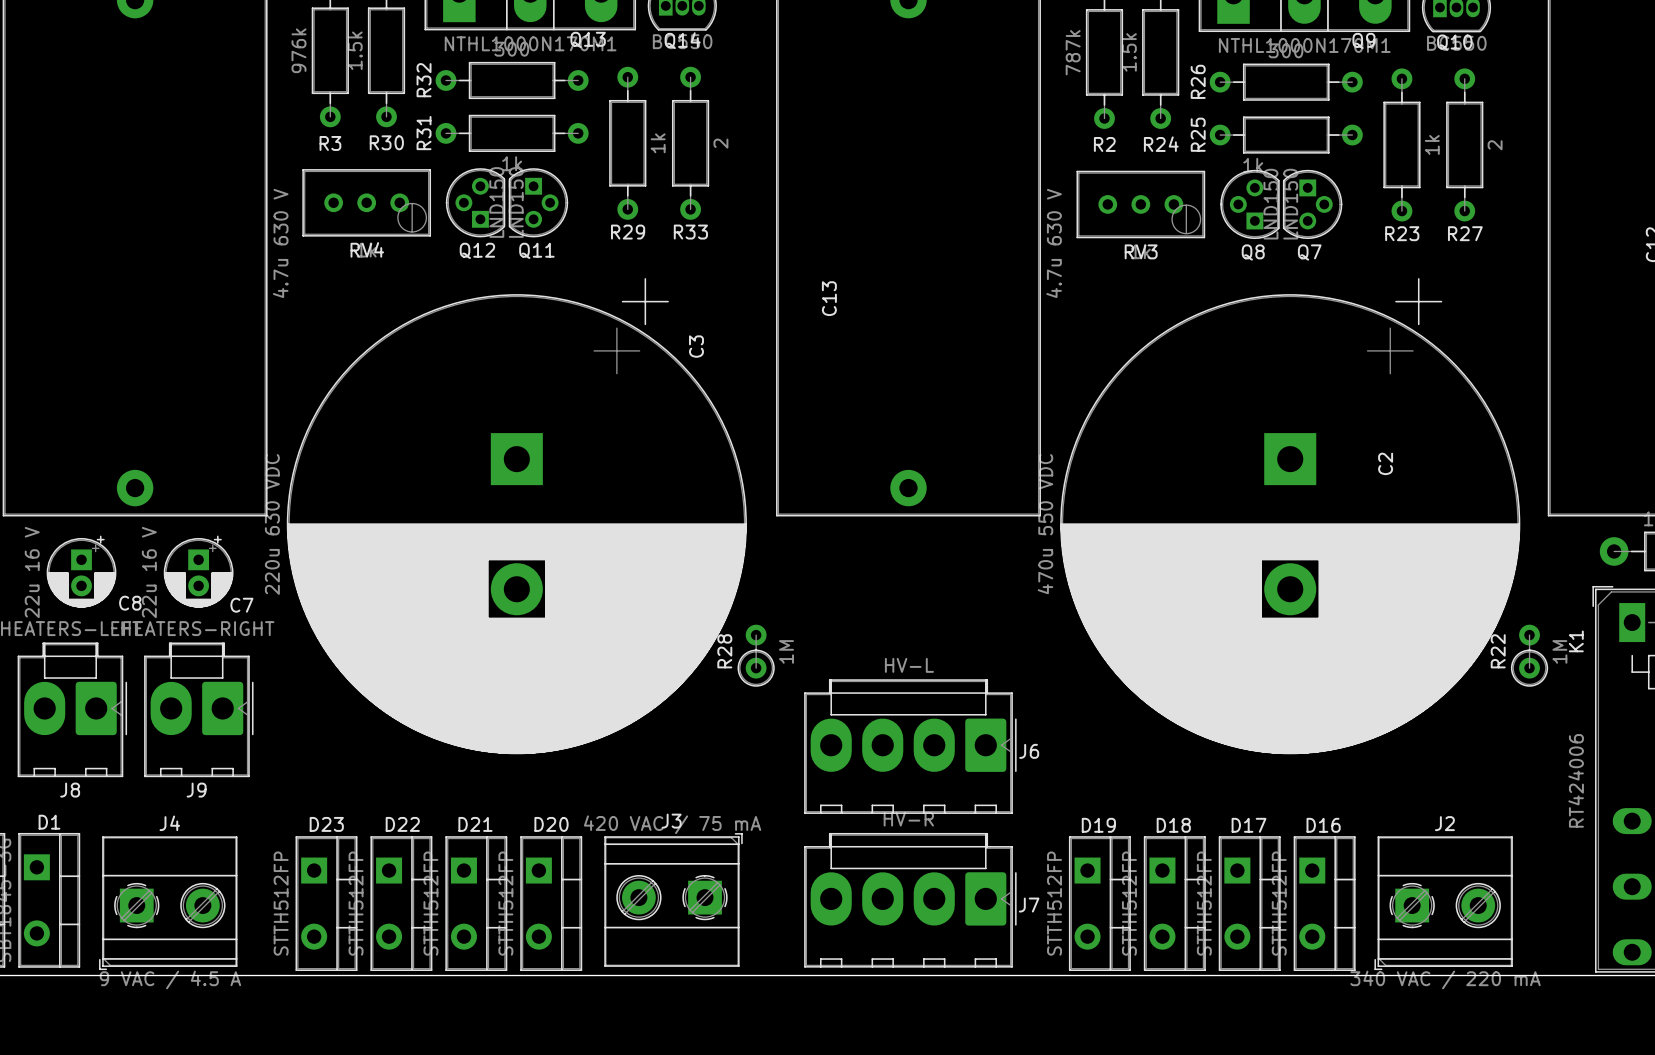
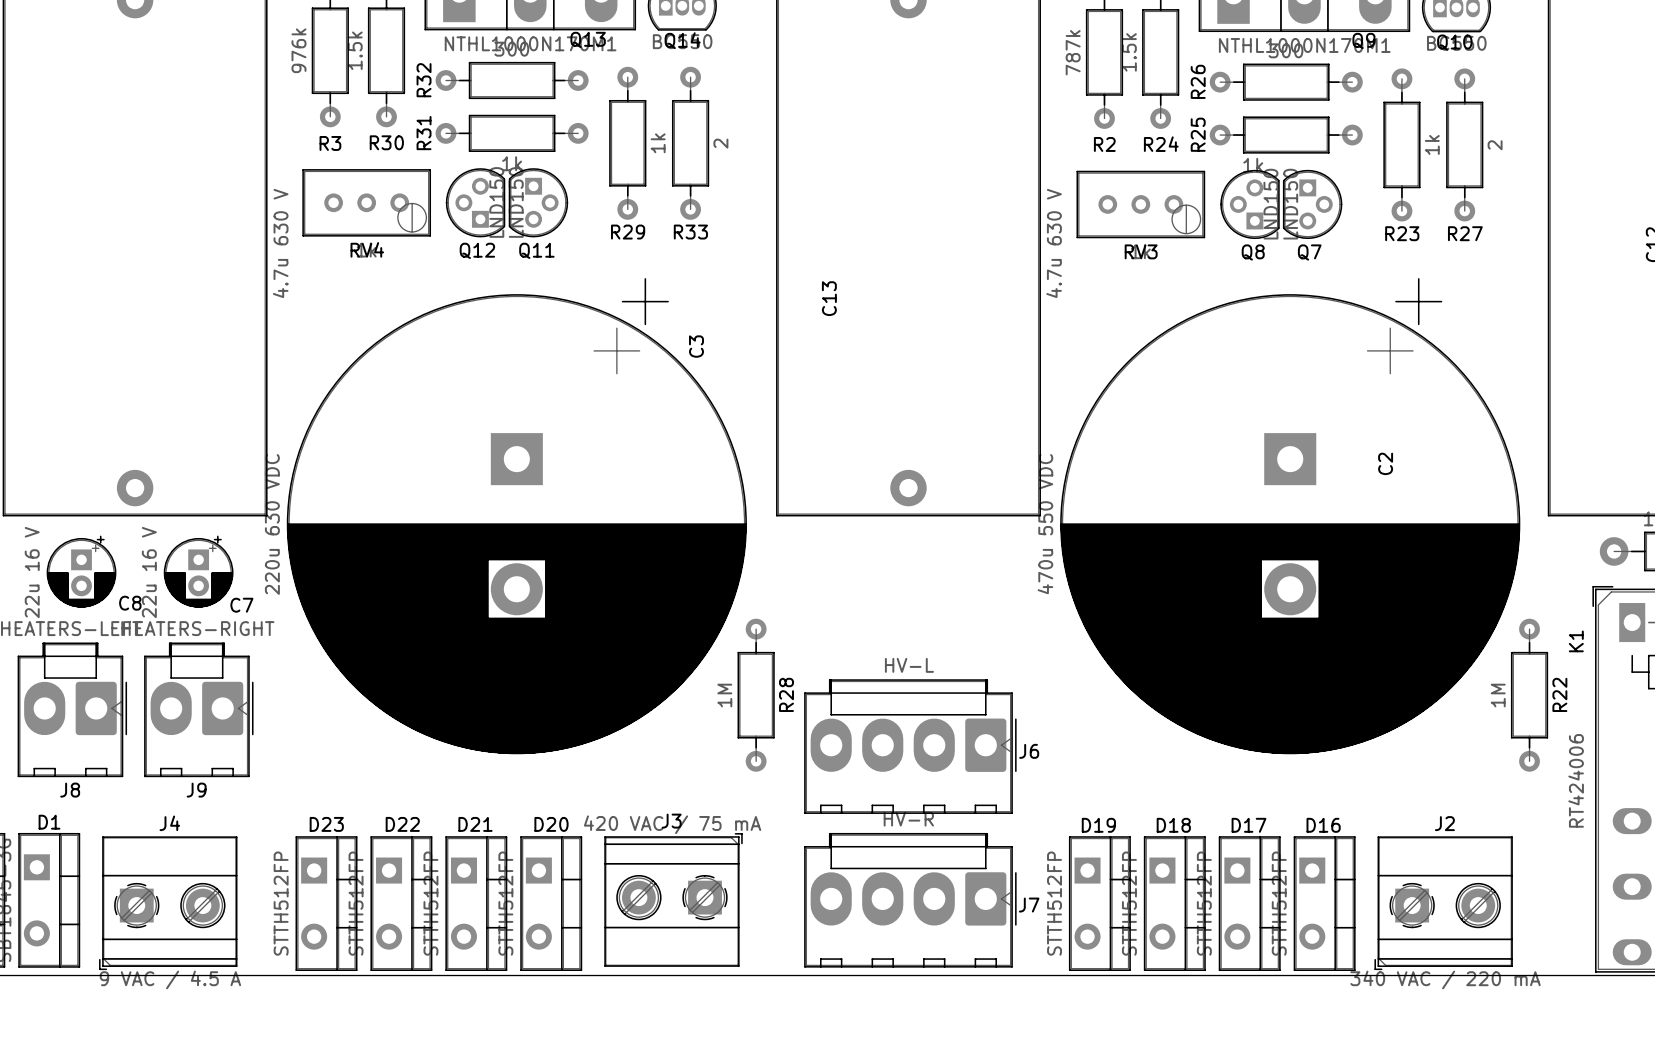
R28 footprint: [737, 624, 775, 687] -> [737, 618, 775, 772]
R22 footprint: [1510, 624, 1549, 687] -> [1510, 618, 1549, 772]
R28 name position: R28 (724, 651) -> R28 (786, 694)
R28 value position: 1M (786, 651) -> 1M (724, 695)
R22 name position: R22 (1498, 651) -> R22 (1559, 694)
R22 value position: 1M (1559, 651) -> 1M (1498, 695)

